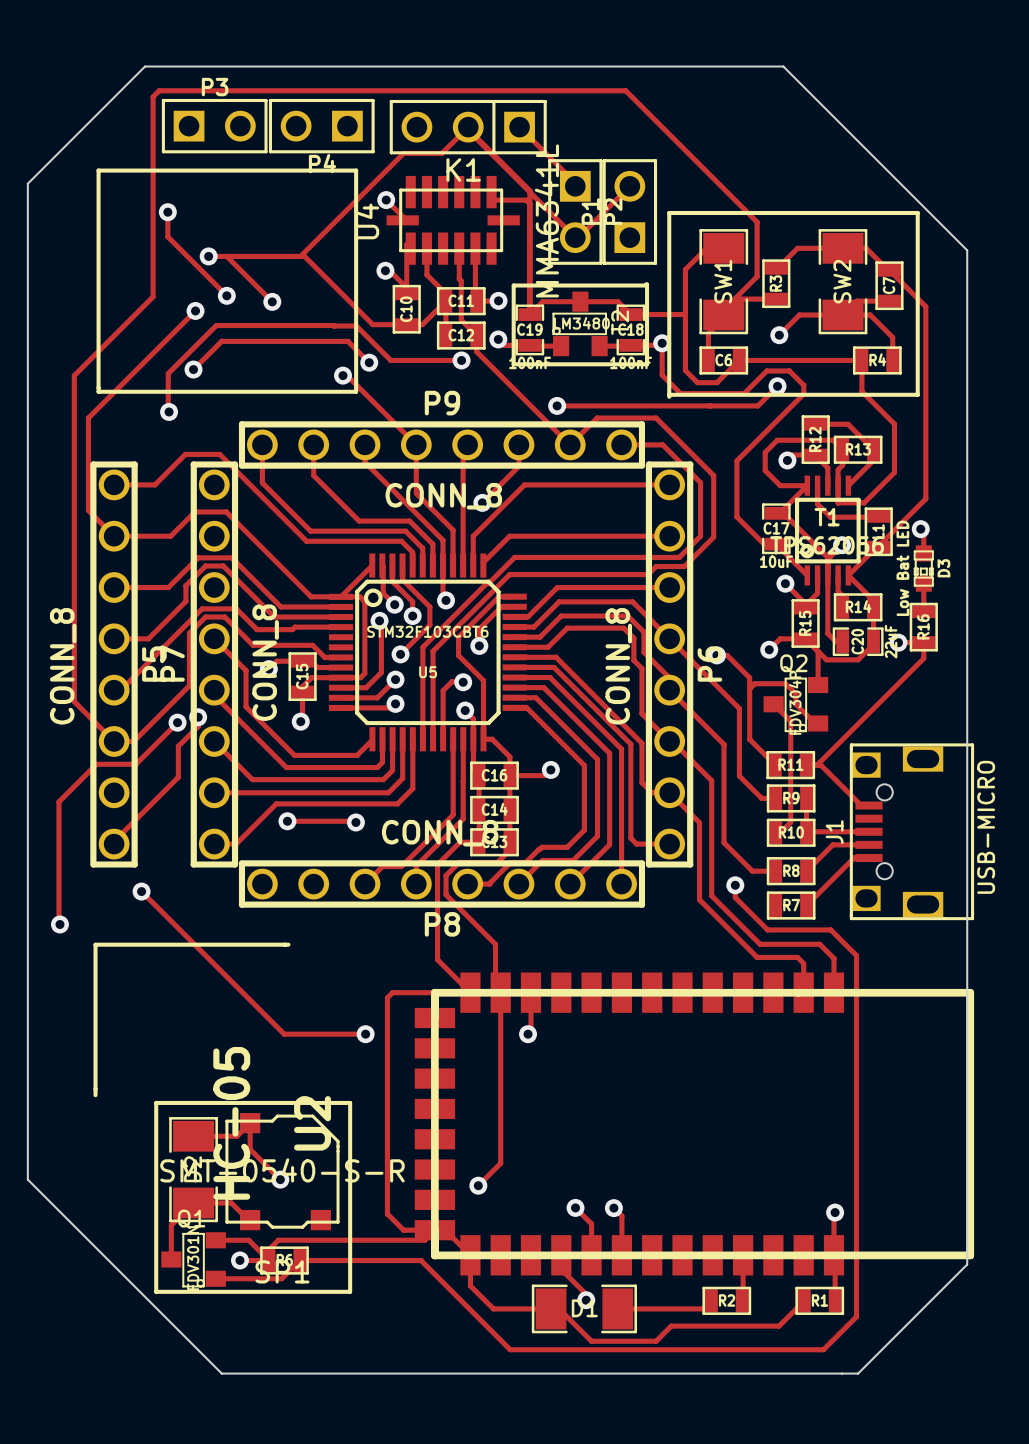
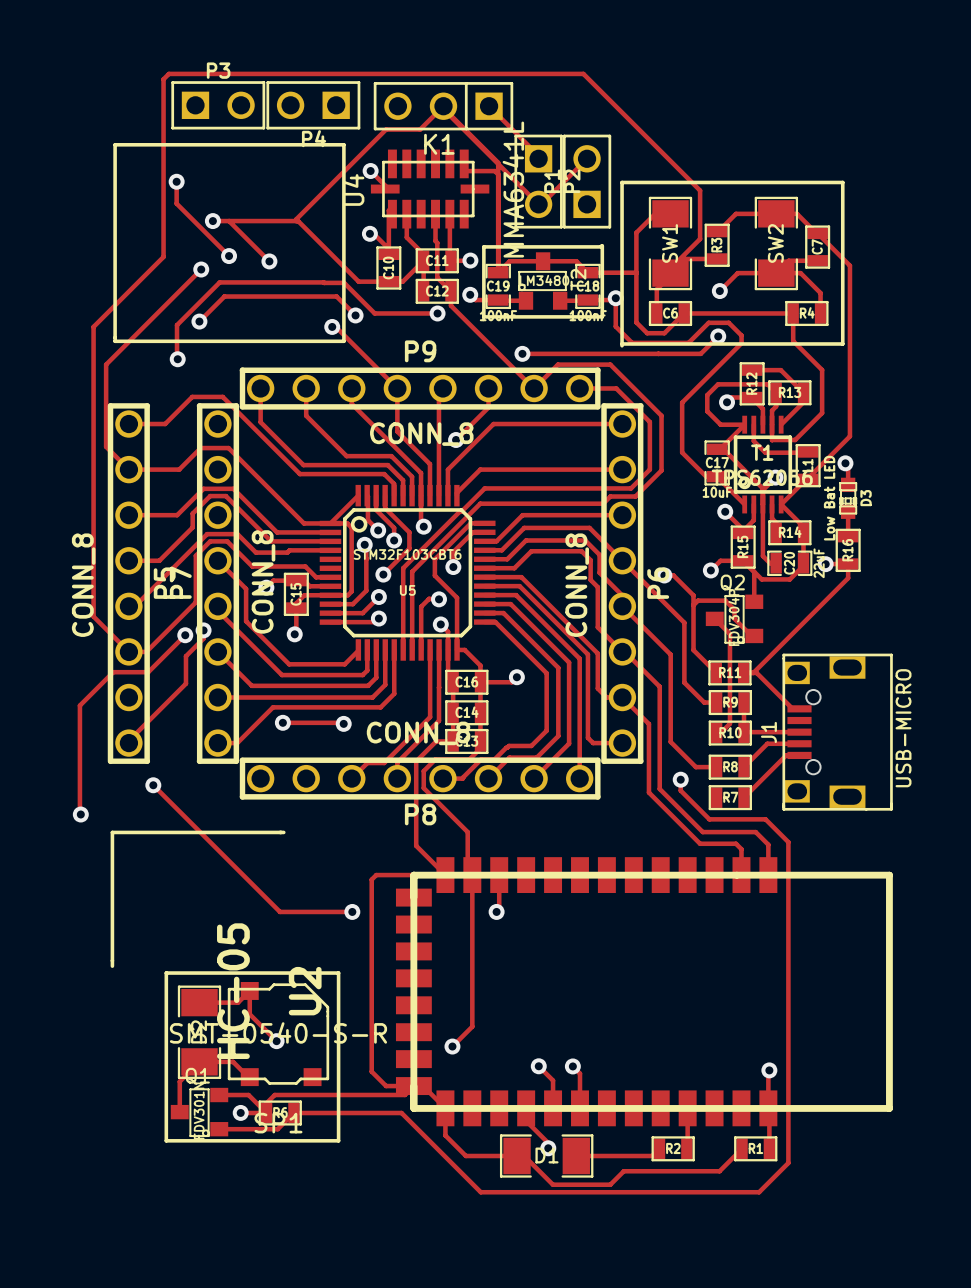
board edge: (145, 66) (27, 183) (27, 1179) (221, 1373) (858, 1373) (967, 1264) (967, 250) (783, 66) (145, 66) -> none

